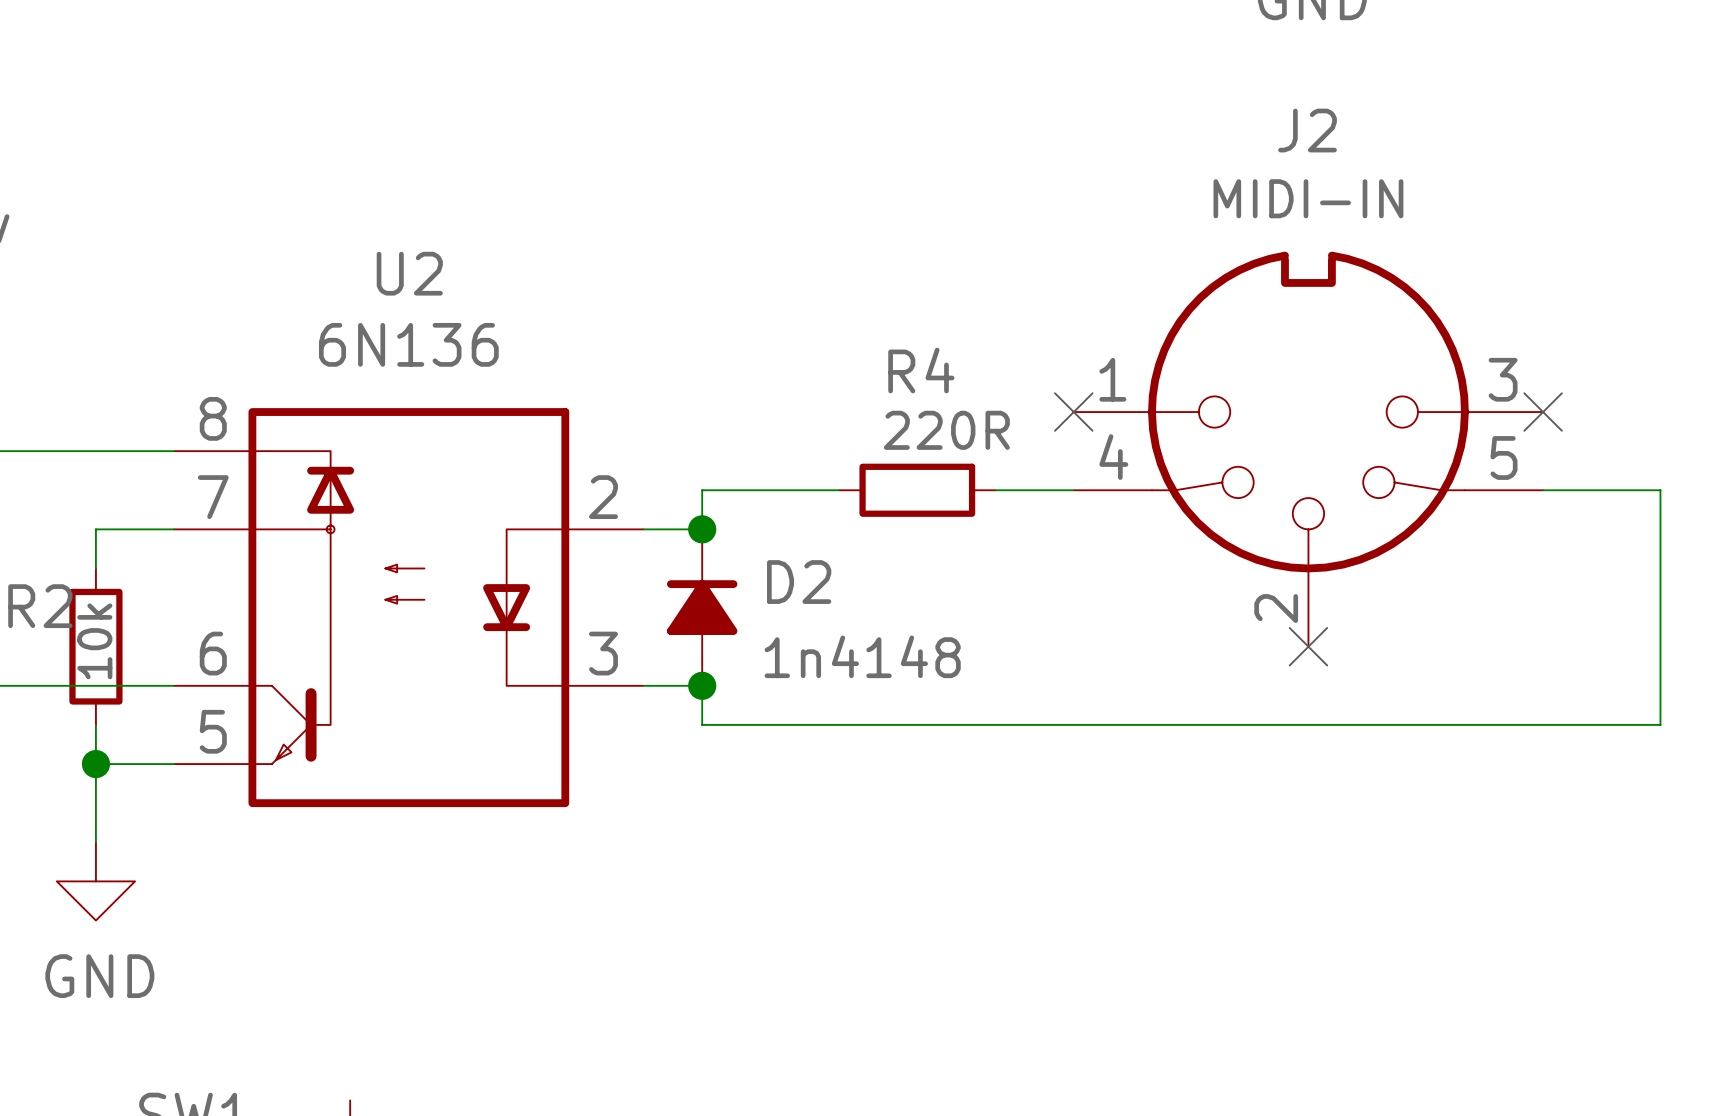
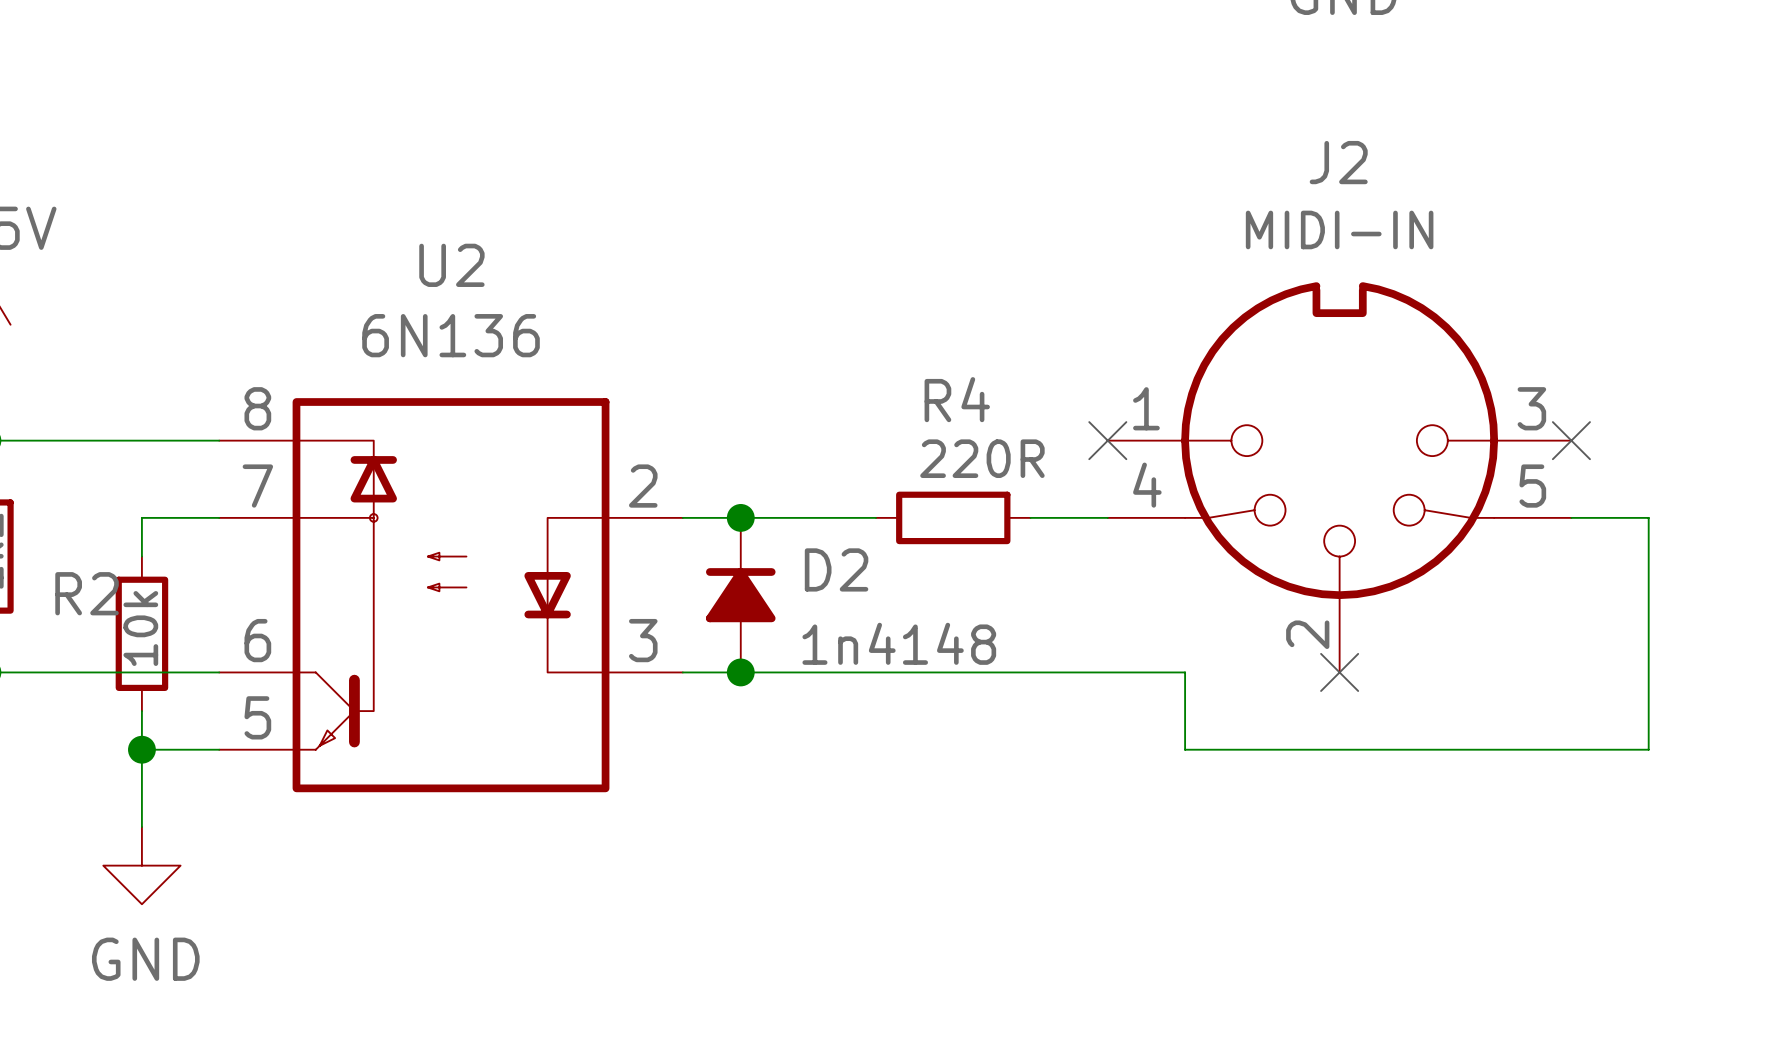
no-connect mark position: (1073, 412) -> (1107, 440)
no-connect mark position: (1543, 412) -> (1571, 440)
J2 position: (1308, 449) -> (1339, 477)
wire: (839, 490) (702, 490) (702, 529) -> (876, 517) (740, 517)
R4 position: (917, 490) -> (953, 517)
wire: (995, 490) (1073, 490) -> (1030, 517) (1107, 517)
wire: (1543, 490) (1660, 490) (1660, 724) (702, 724) (702, 685) -> (1571, 517) (1648, 517) (1648, 749) (1185, 749) (1185, 672) (740, 672)
no-connect mark position: (1308, 646) -> (1339, 672)

